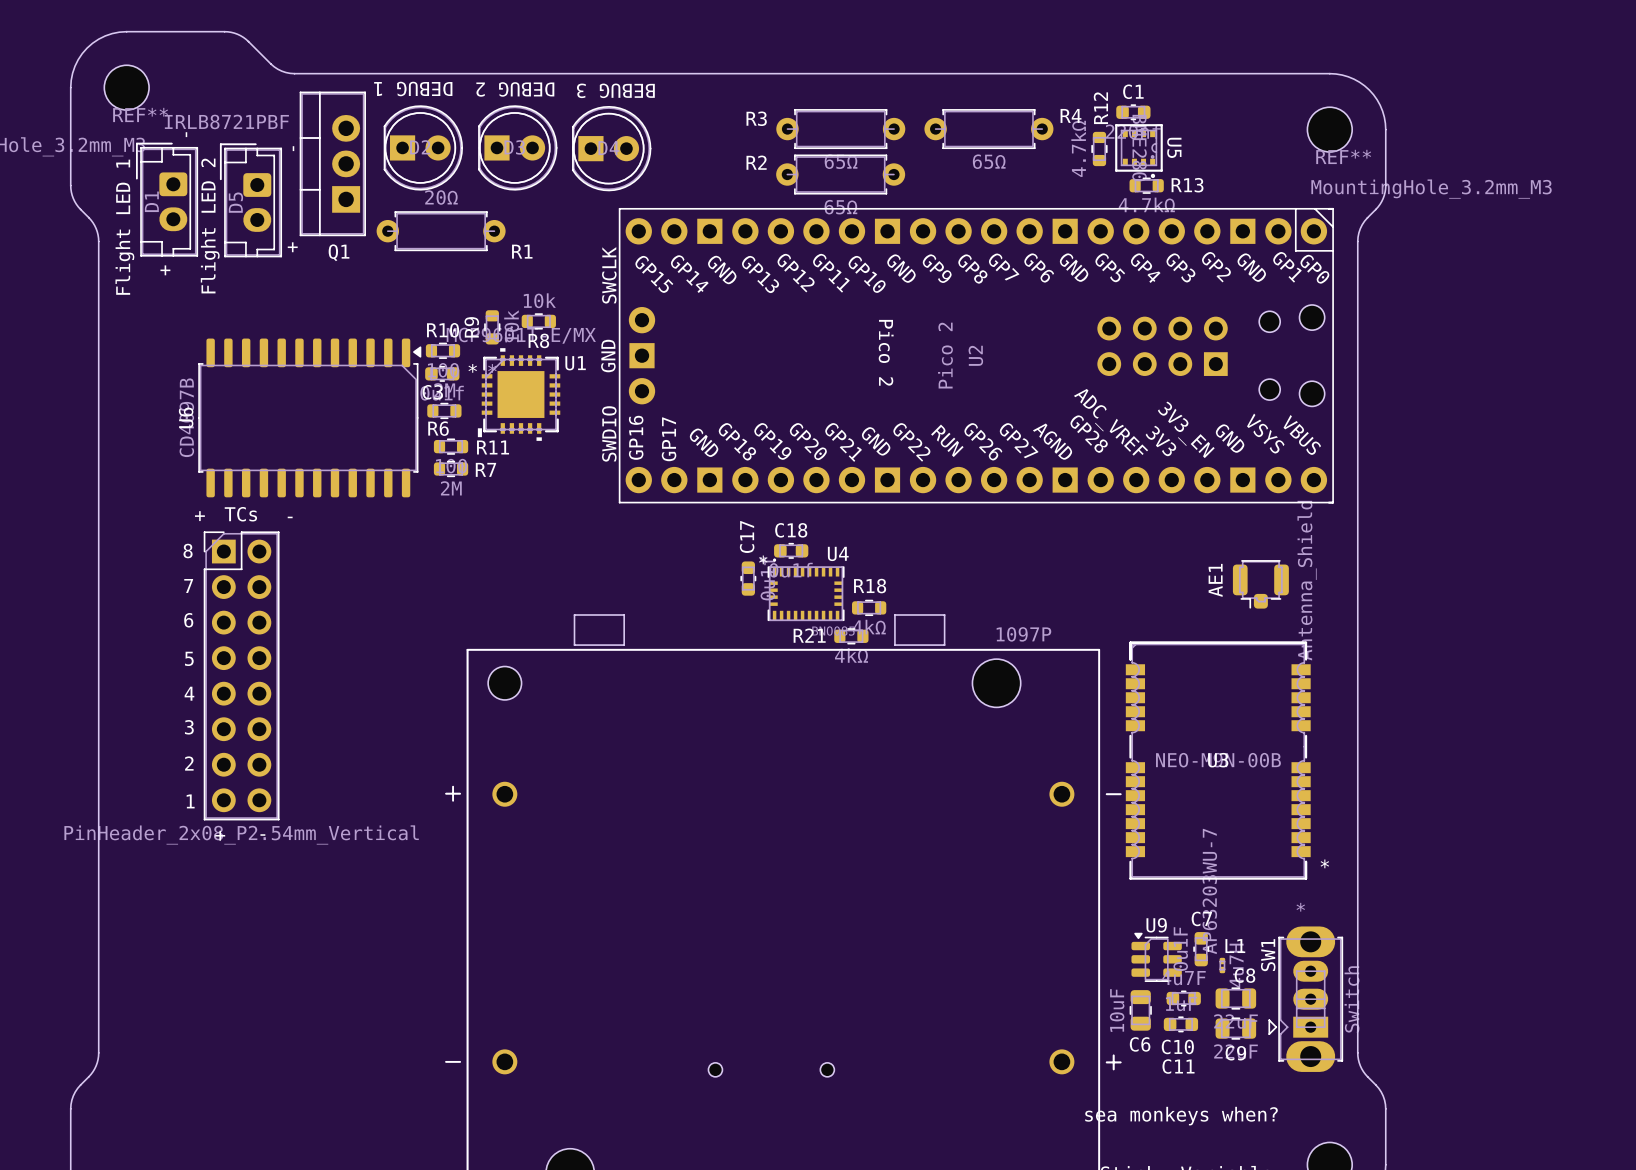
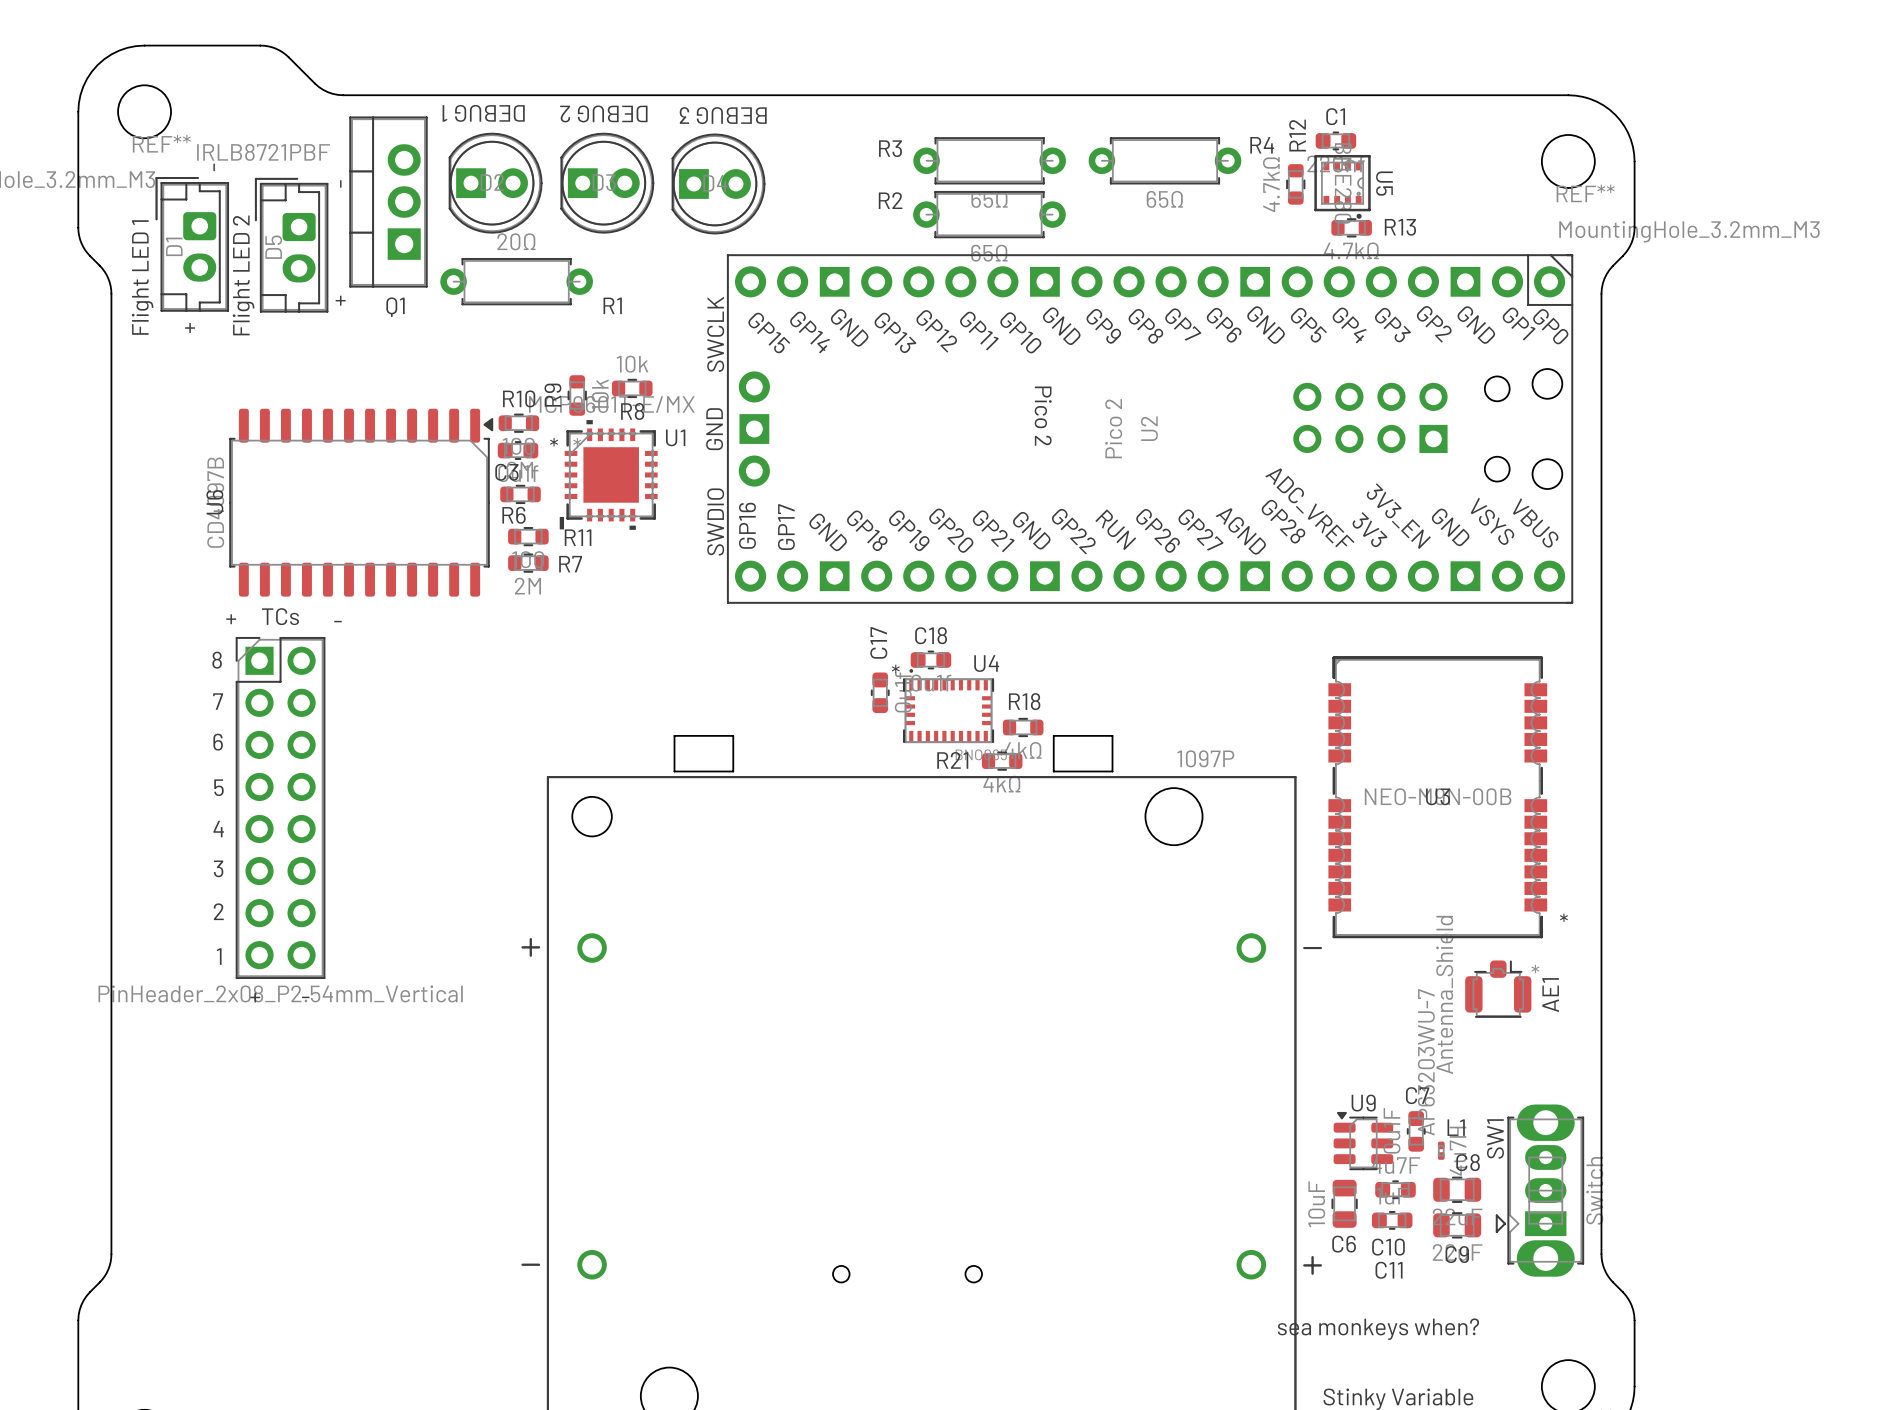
AE1 rotation: 0° (1260, 584) -> 180° (1498, 989)
AE1 position: (1260, 584) -> (1498, 989)
U3 position: (1218, 760) -> (1437, 797)

